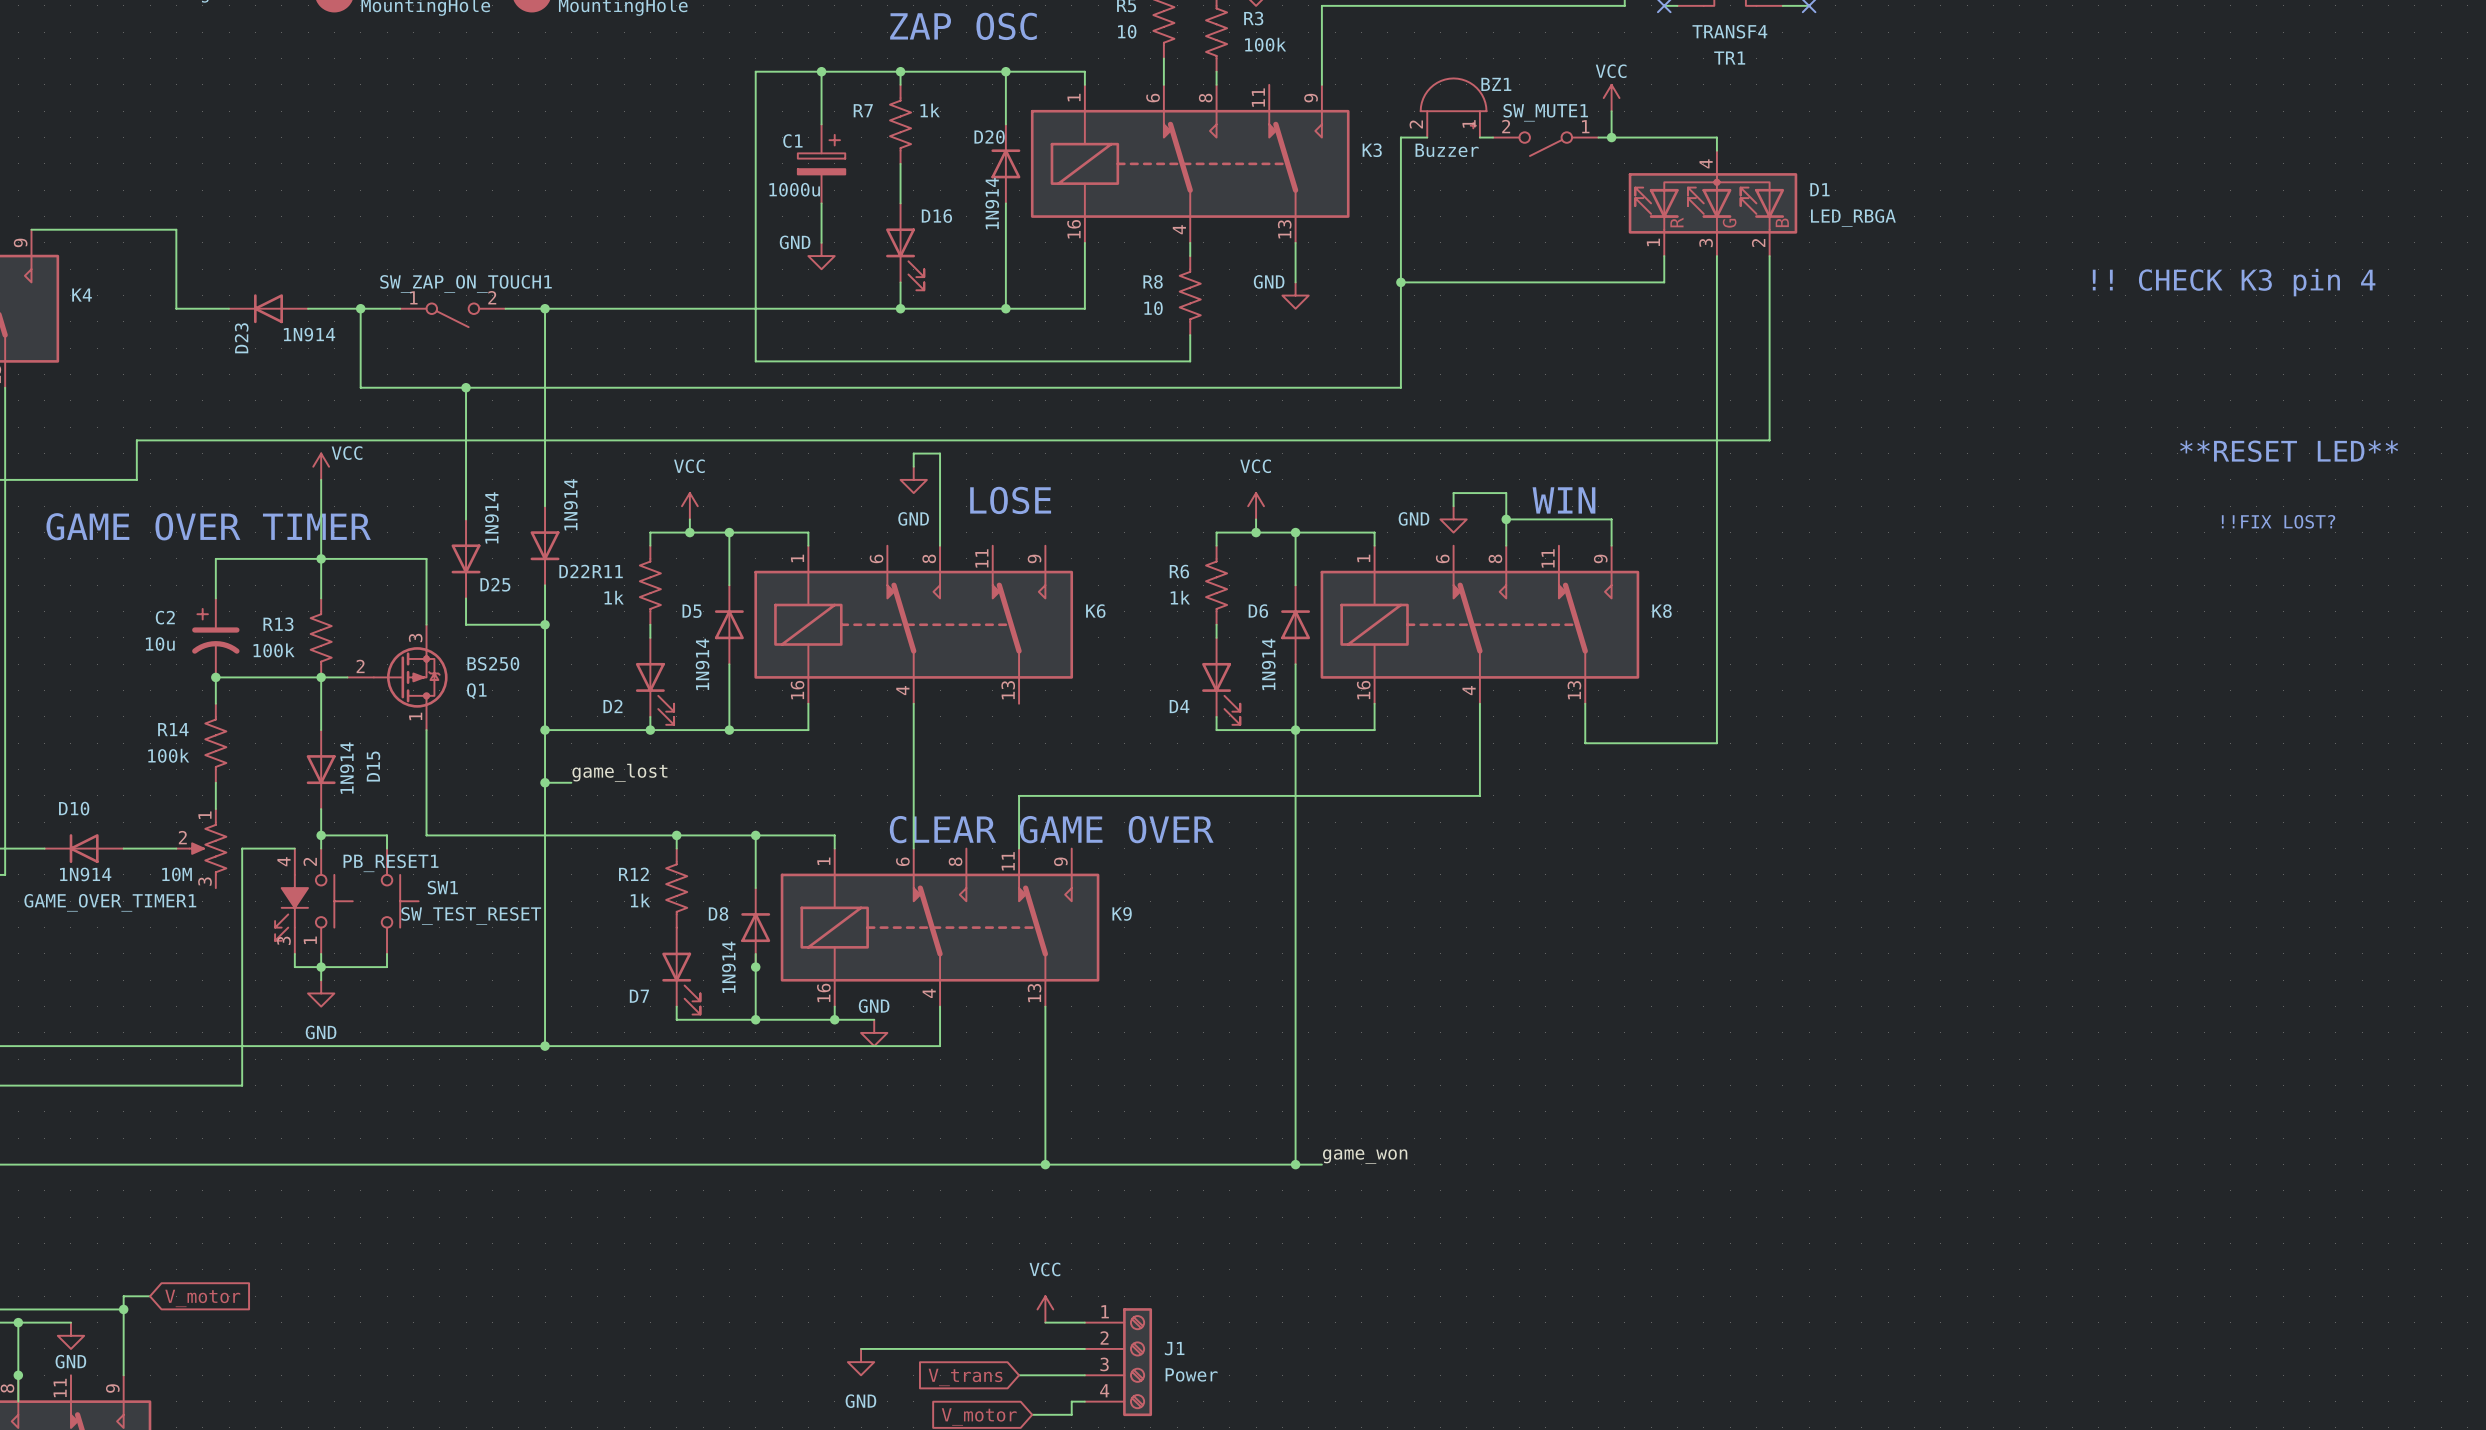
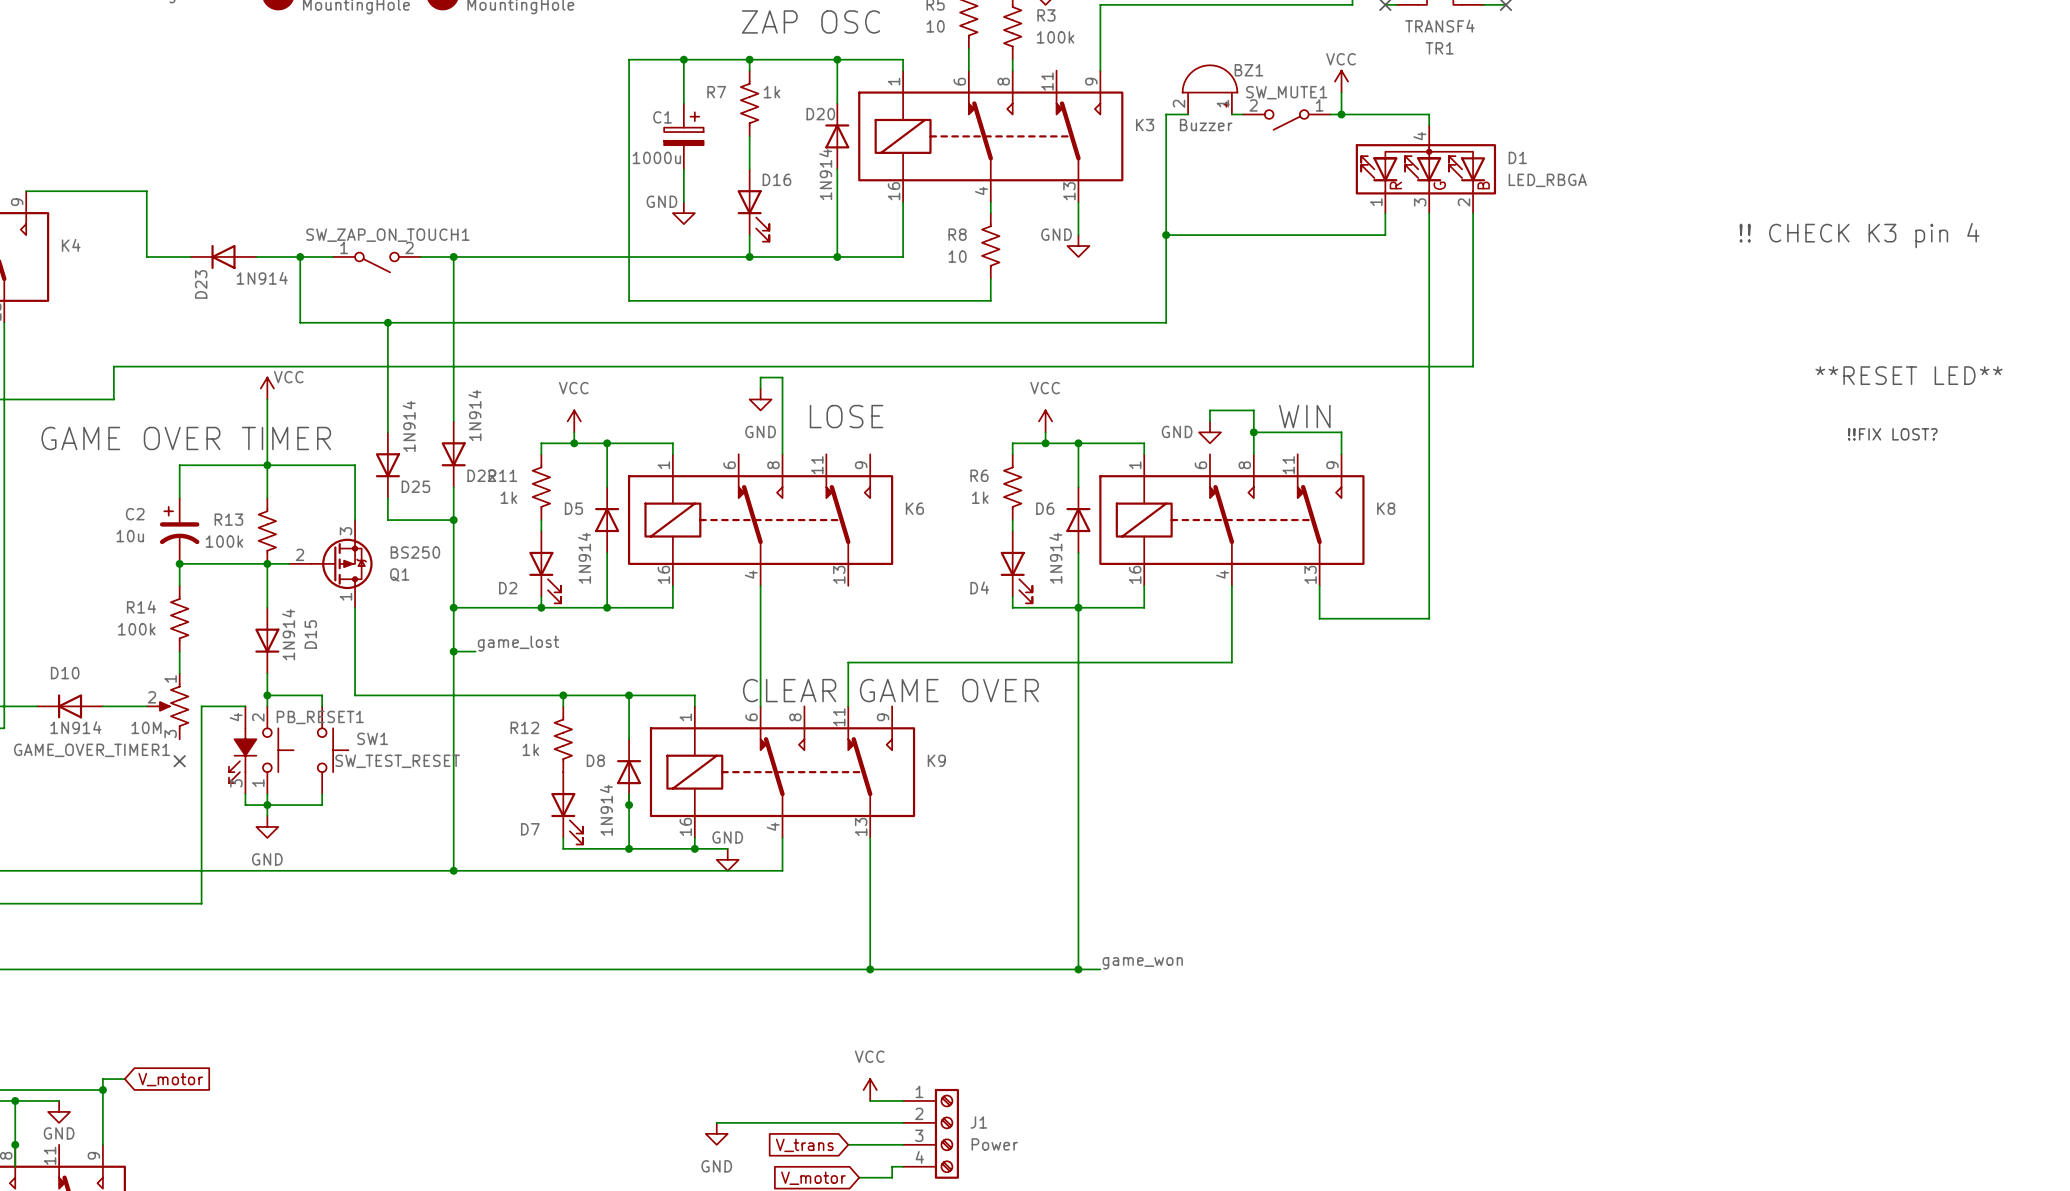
no-connect mark: none -> (179, 761)

